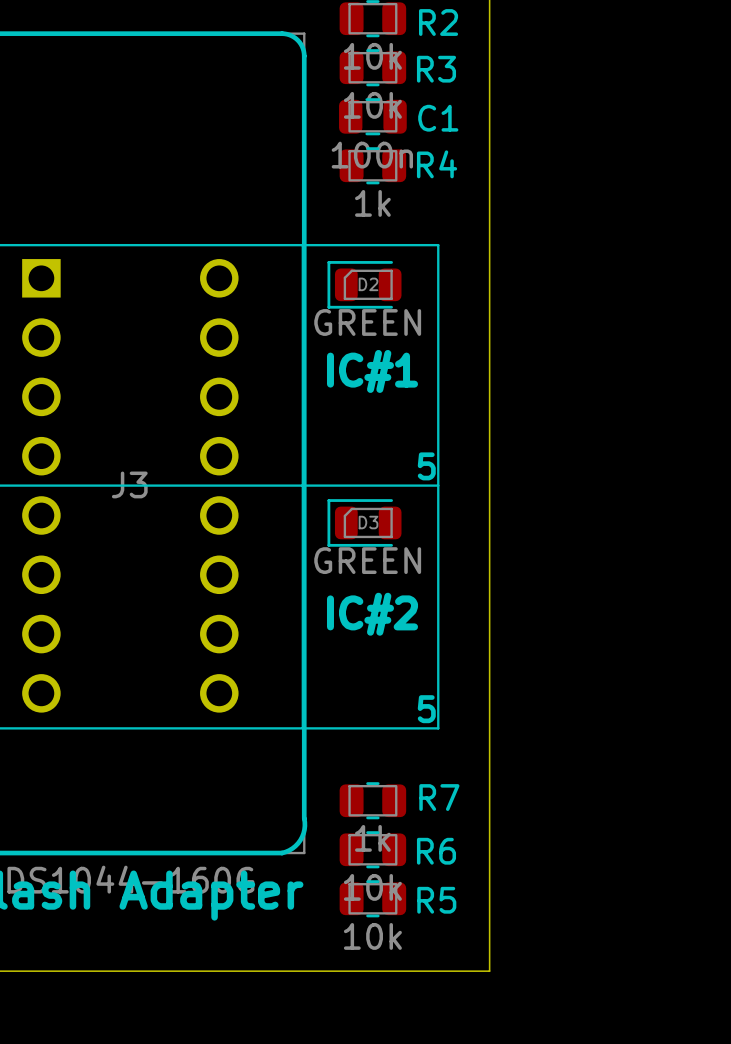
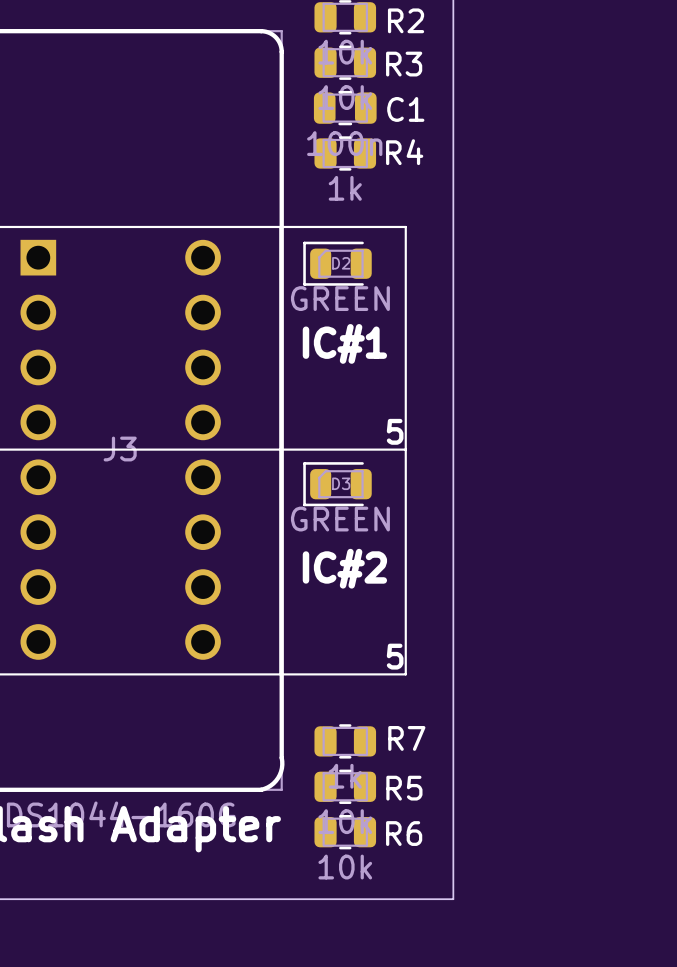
R6 name: R6 (436, 851) -> R5 (404, 788)
R5 name: R5 (436, 900) -> R6 (404, 833)

